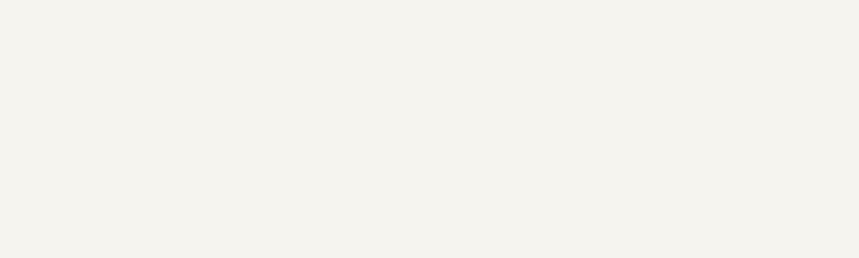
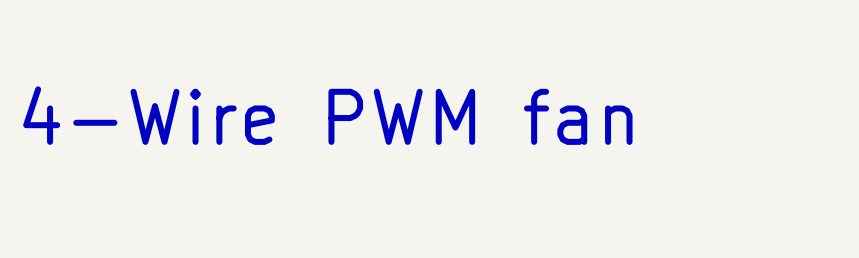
text: none -> 4-Wire PWM fan (327, 115)

